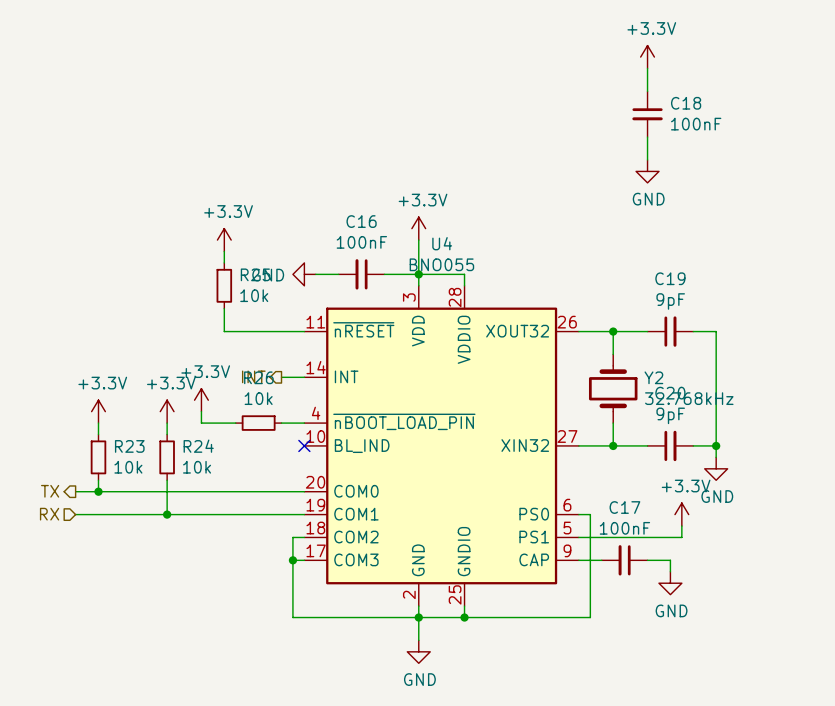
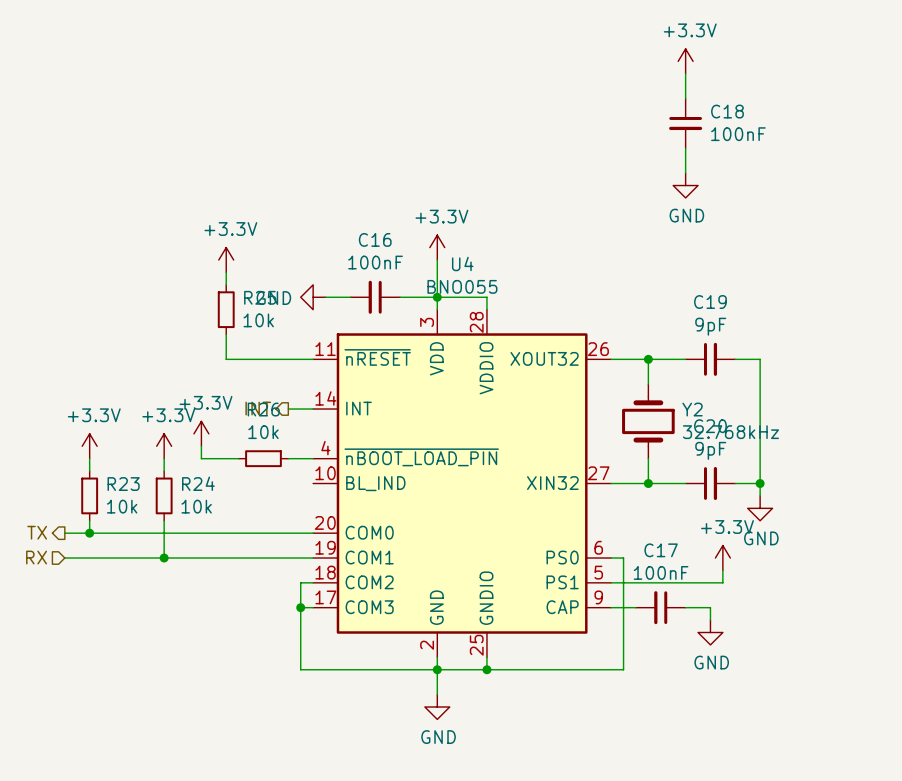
no-connect mark: (304, 445) -> none

